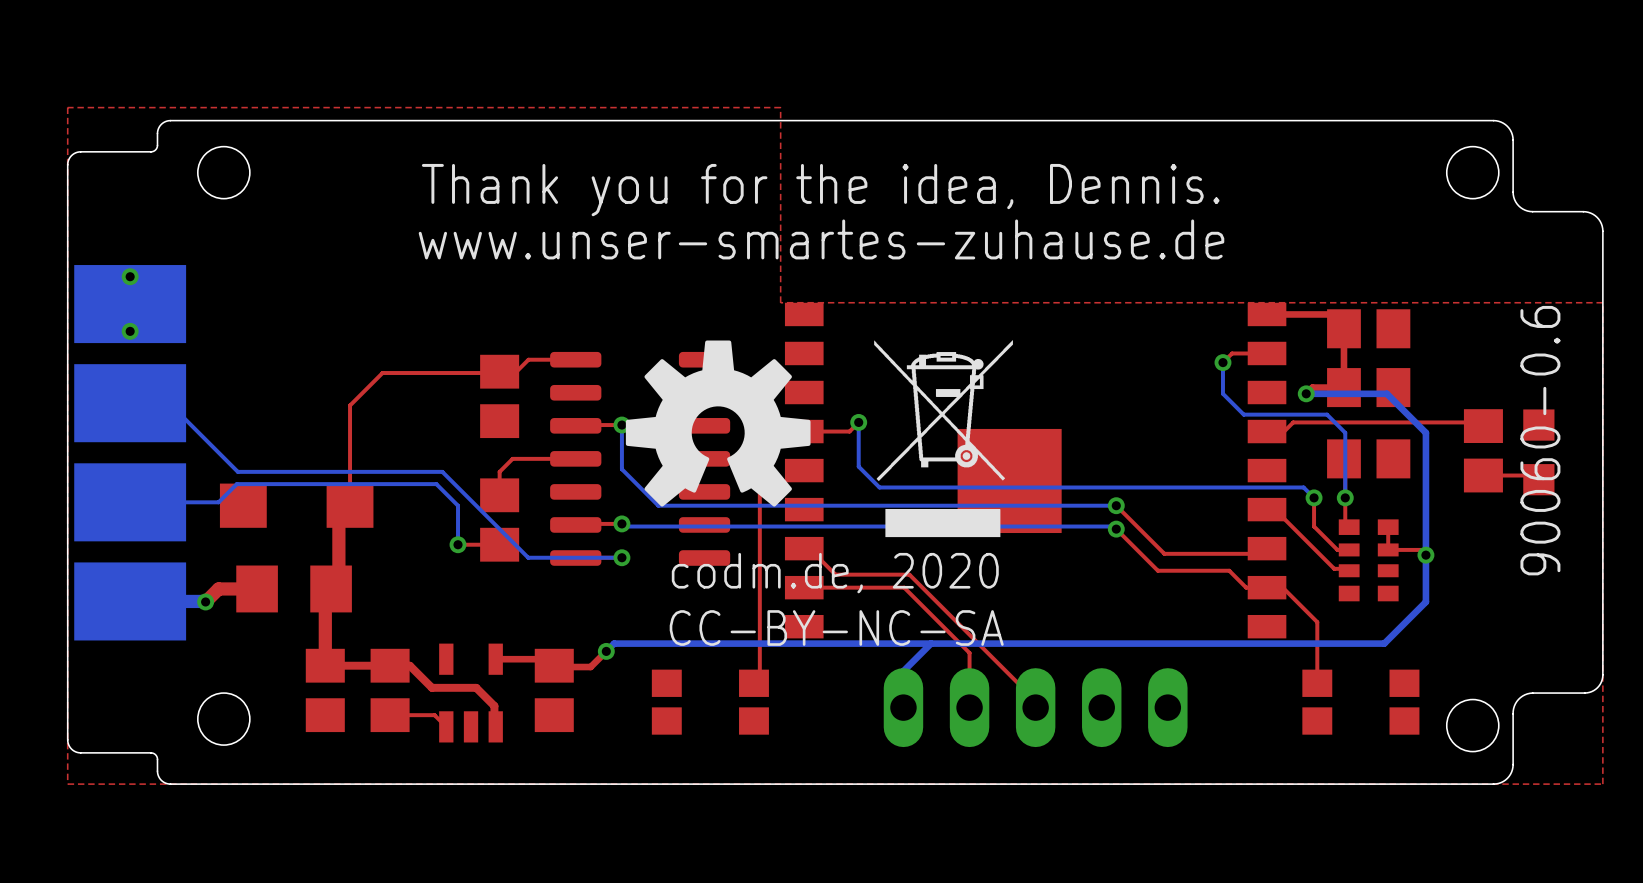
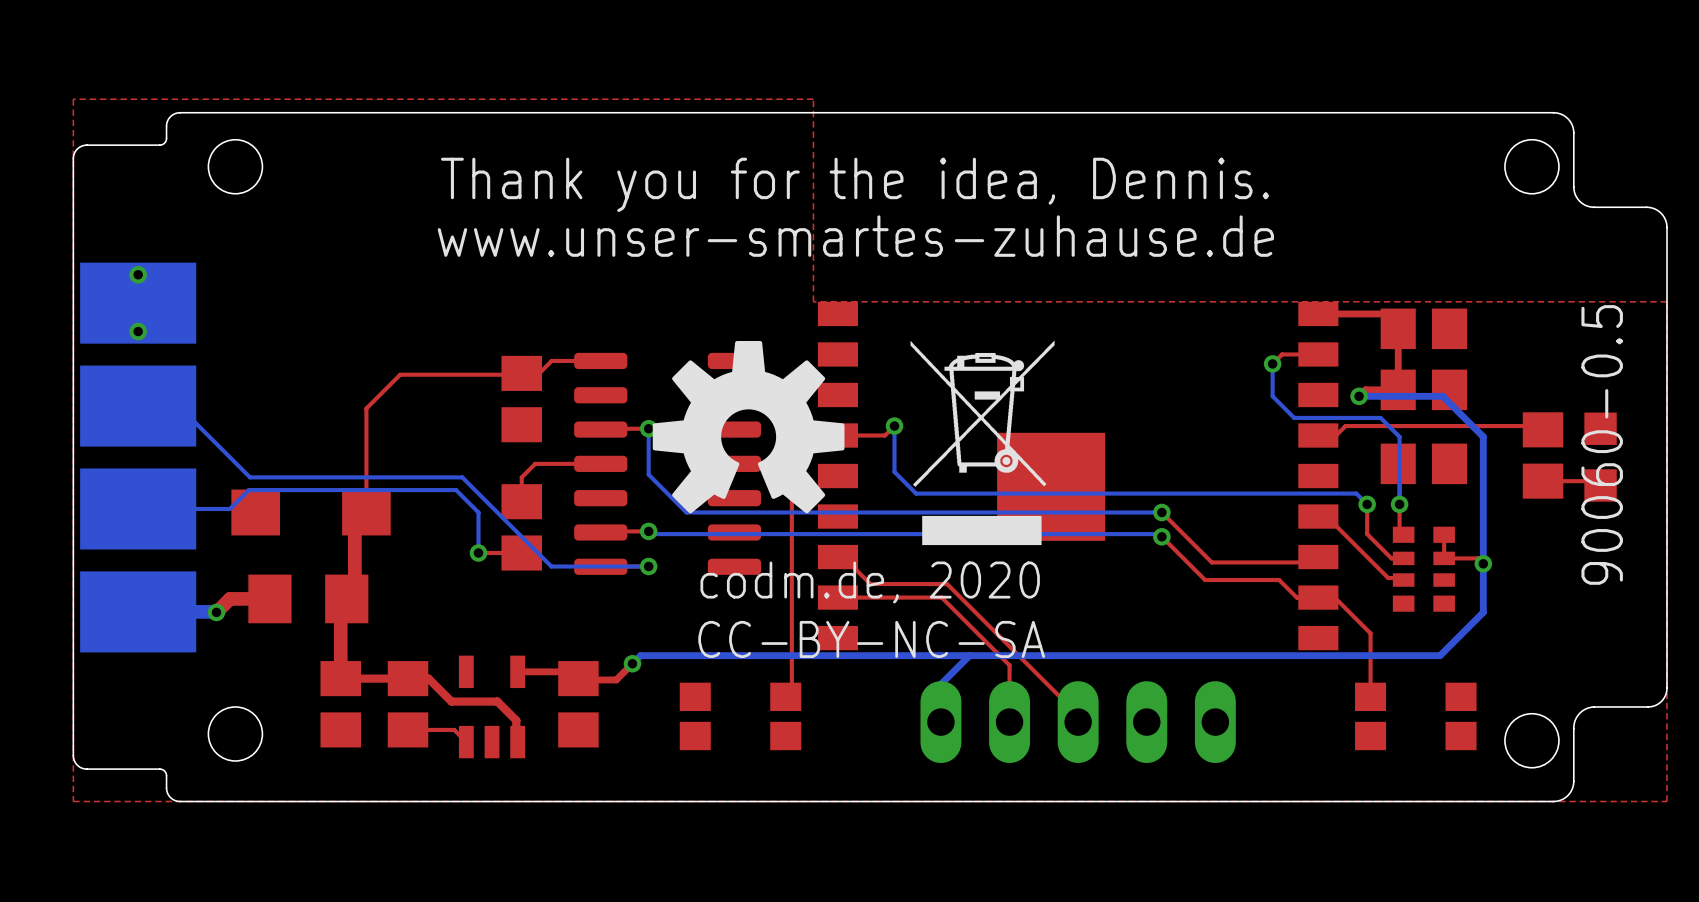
text: 90060-0.6 (1540, 440) -> 90060-0.5 (1602, 444)

